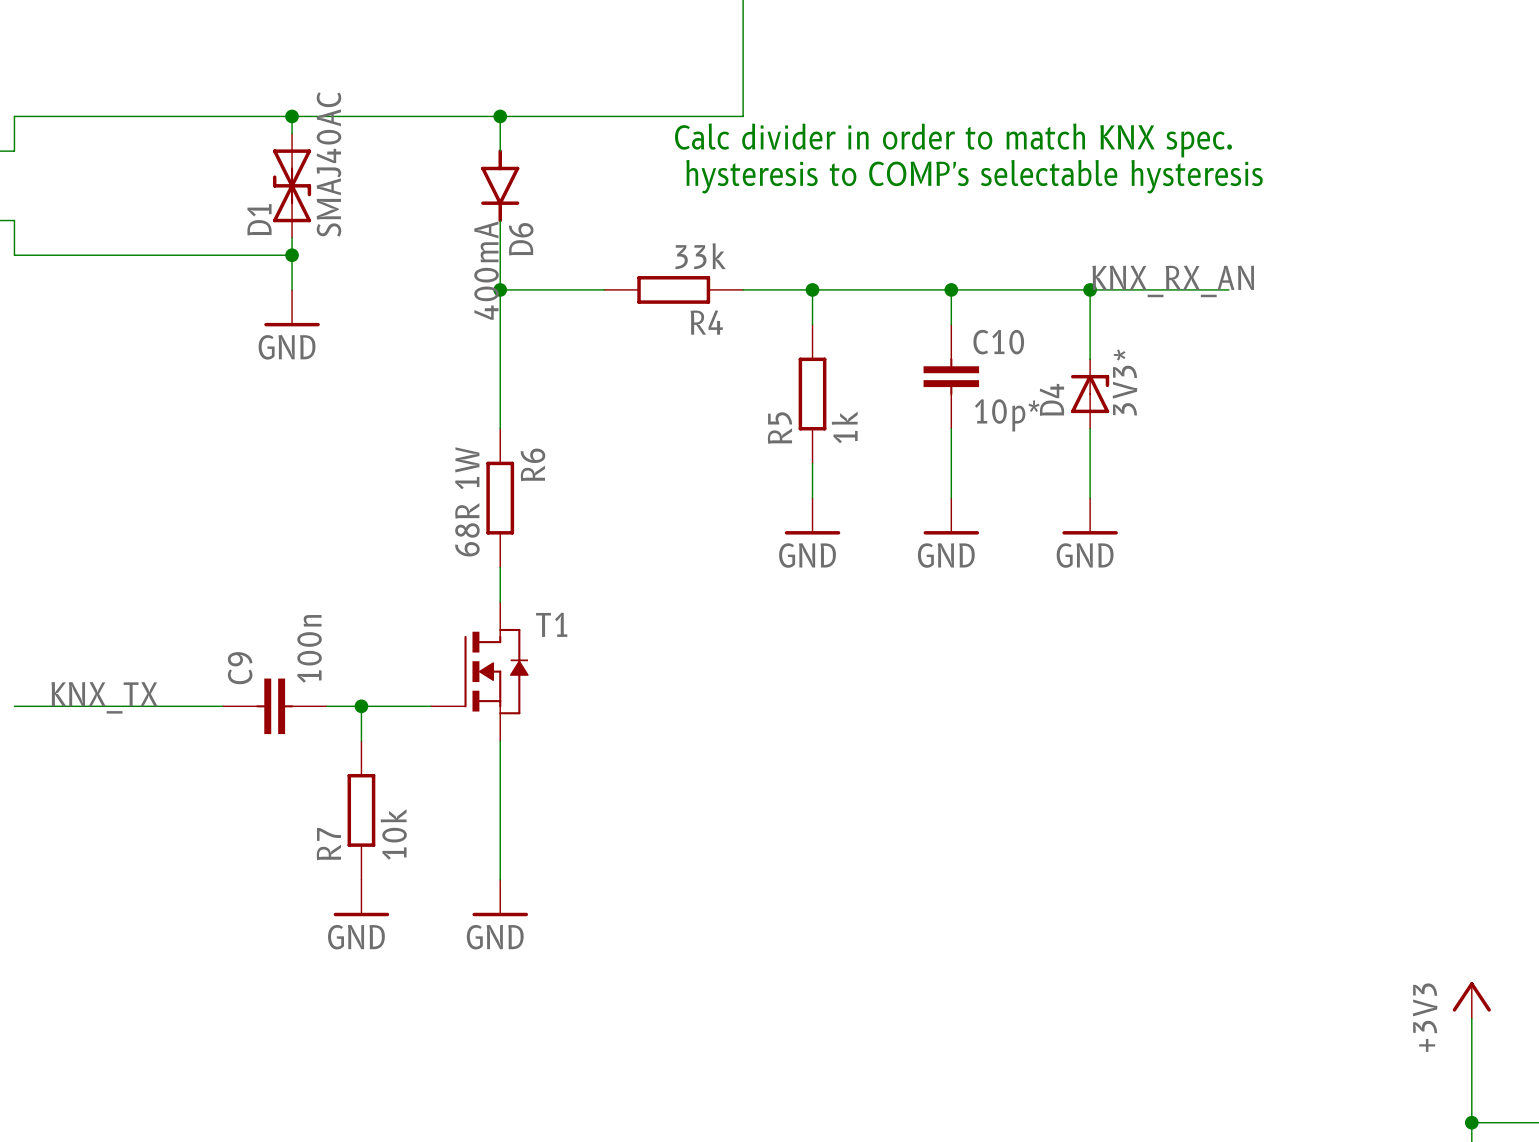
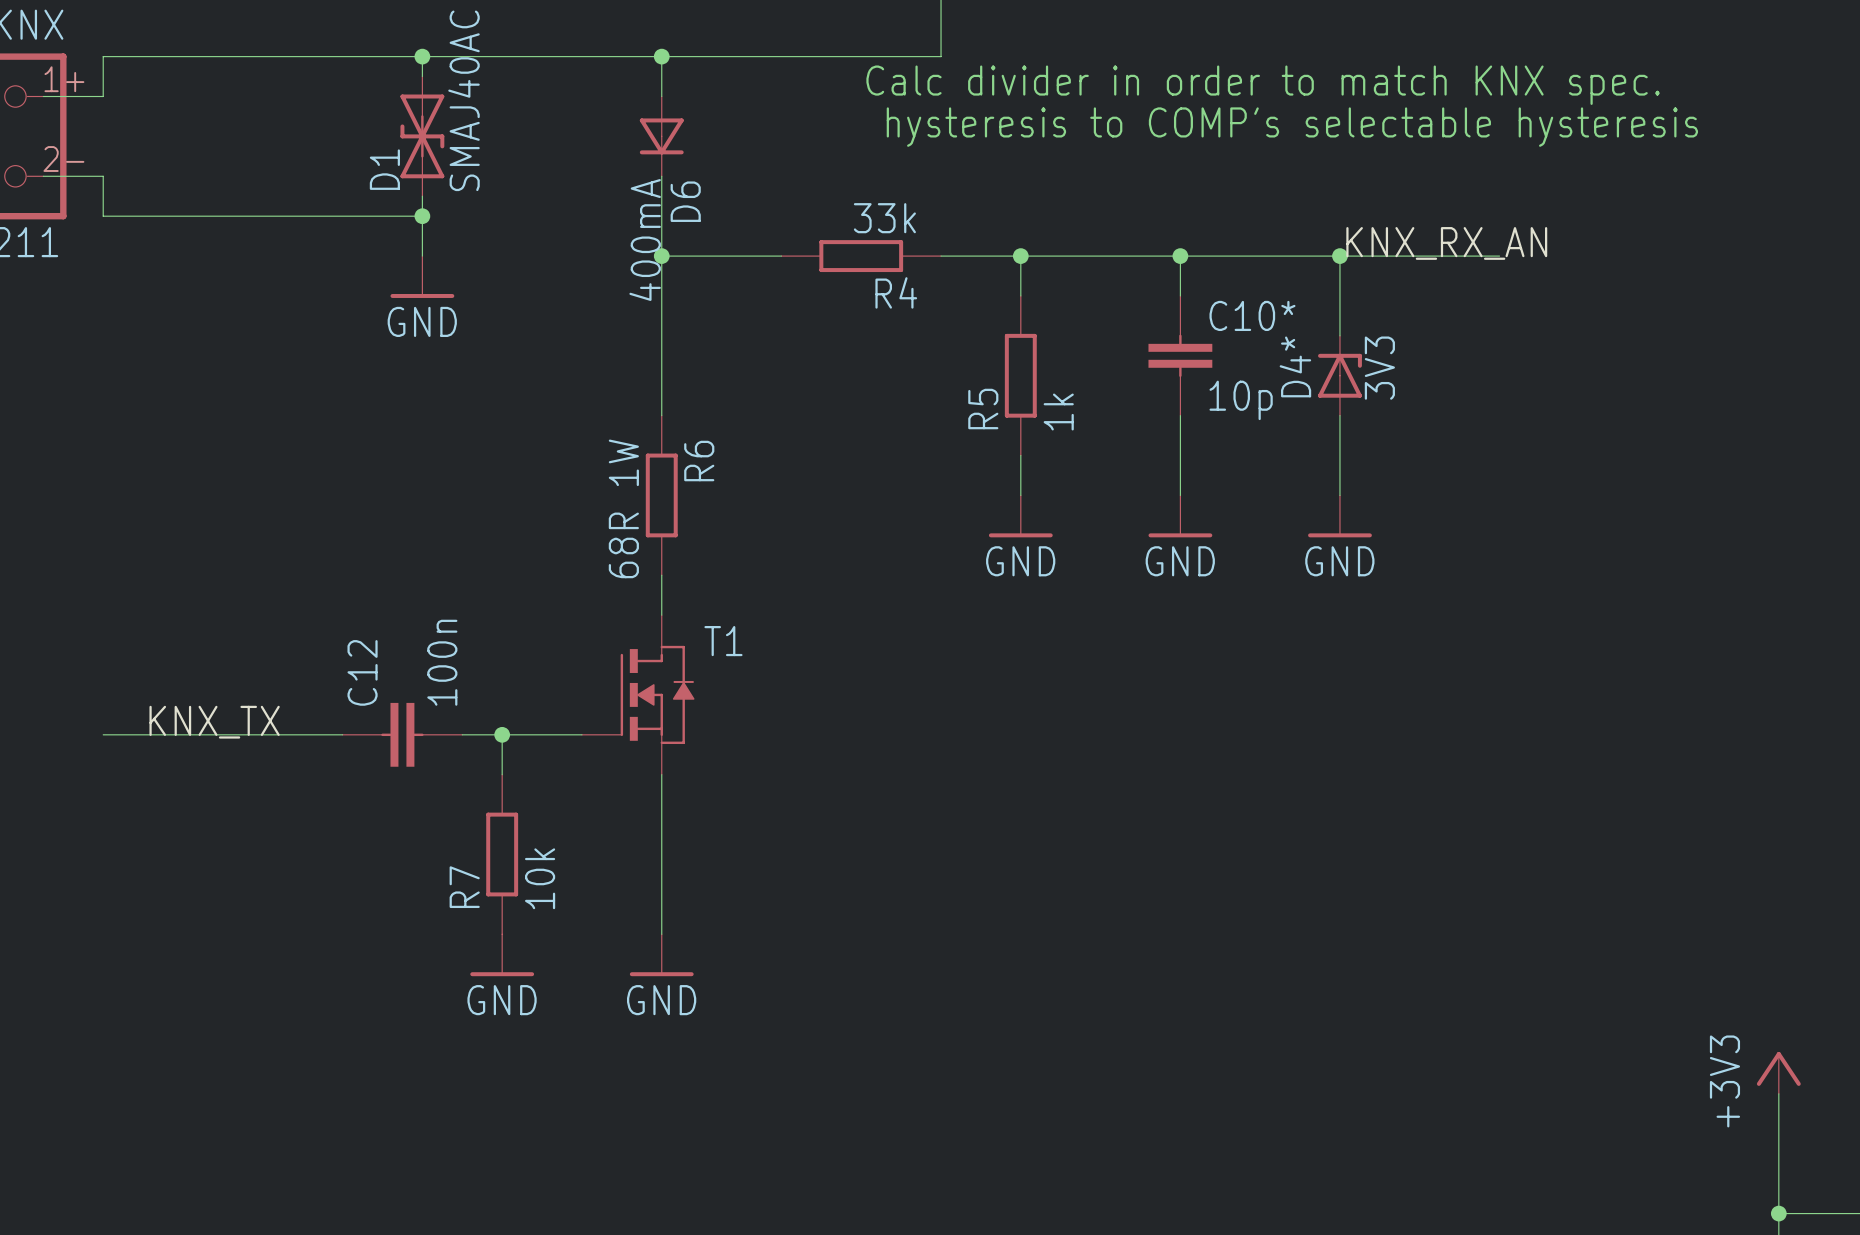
D6 symbol: [481, 149, 520, 223] -> [639, 96, 684, 177]
C10 name: C10 (998, 342) -> C10* (1252, 315)
D4 value: 3V3* (1124, 382) -> 3V3 (1379, 368)
D4 name: D4 (1051, 399) -> D4* (1295, 366)
C10 value: 10p* (1007, 415) -> 10p (1241, 400)
C9 name: C9 (240, 668) -> C12 (362, 672)

